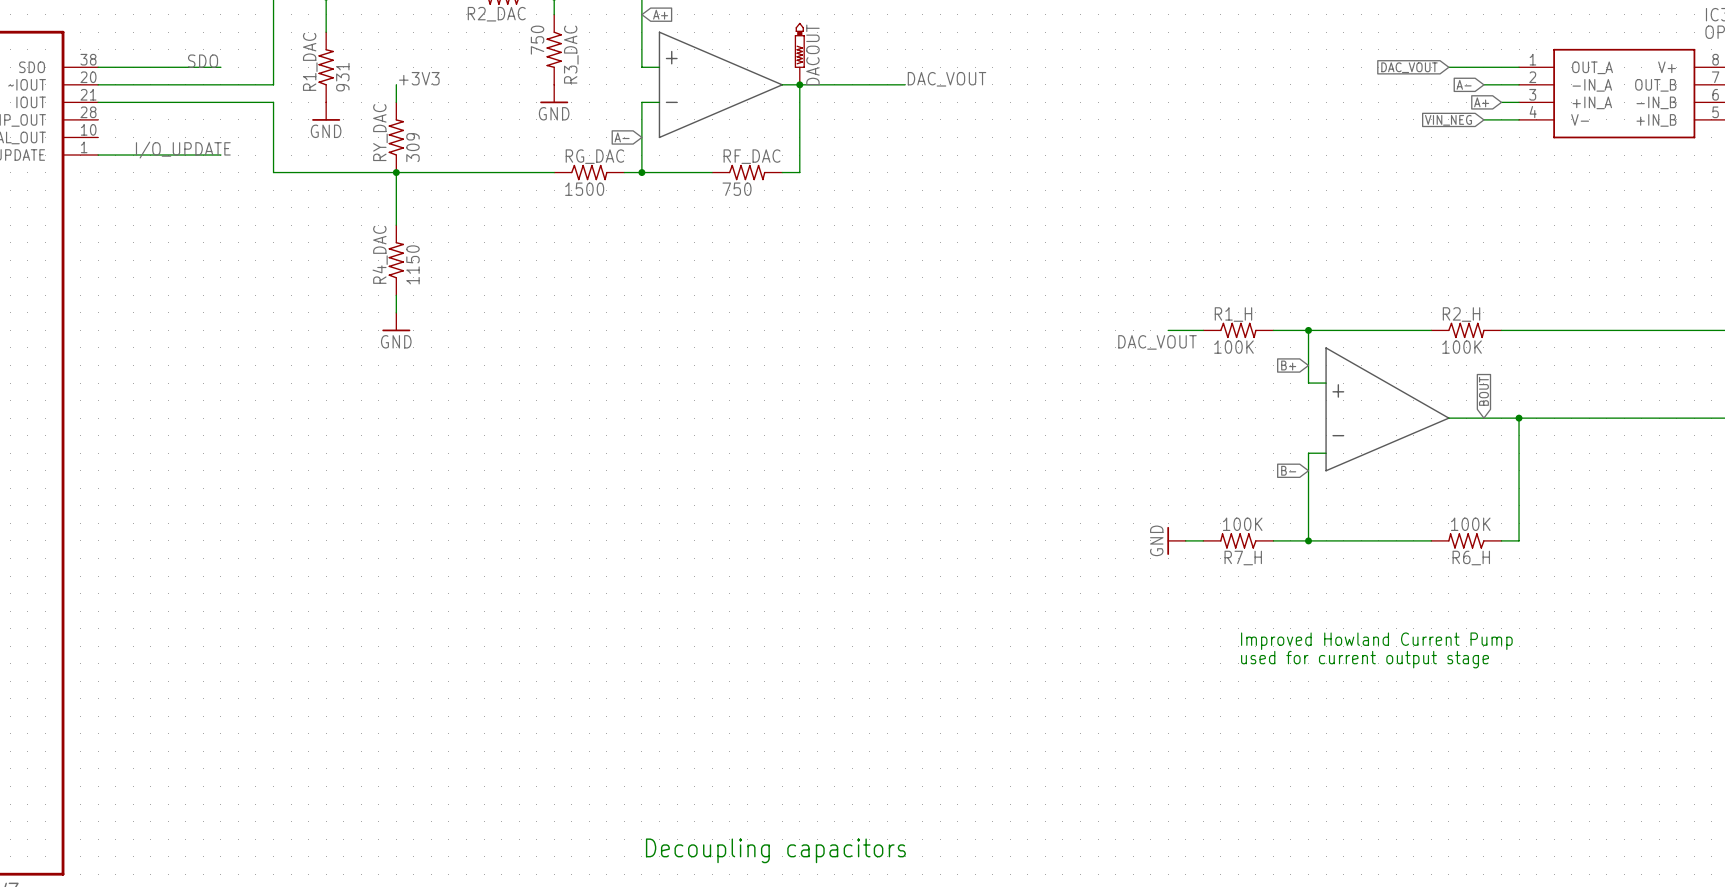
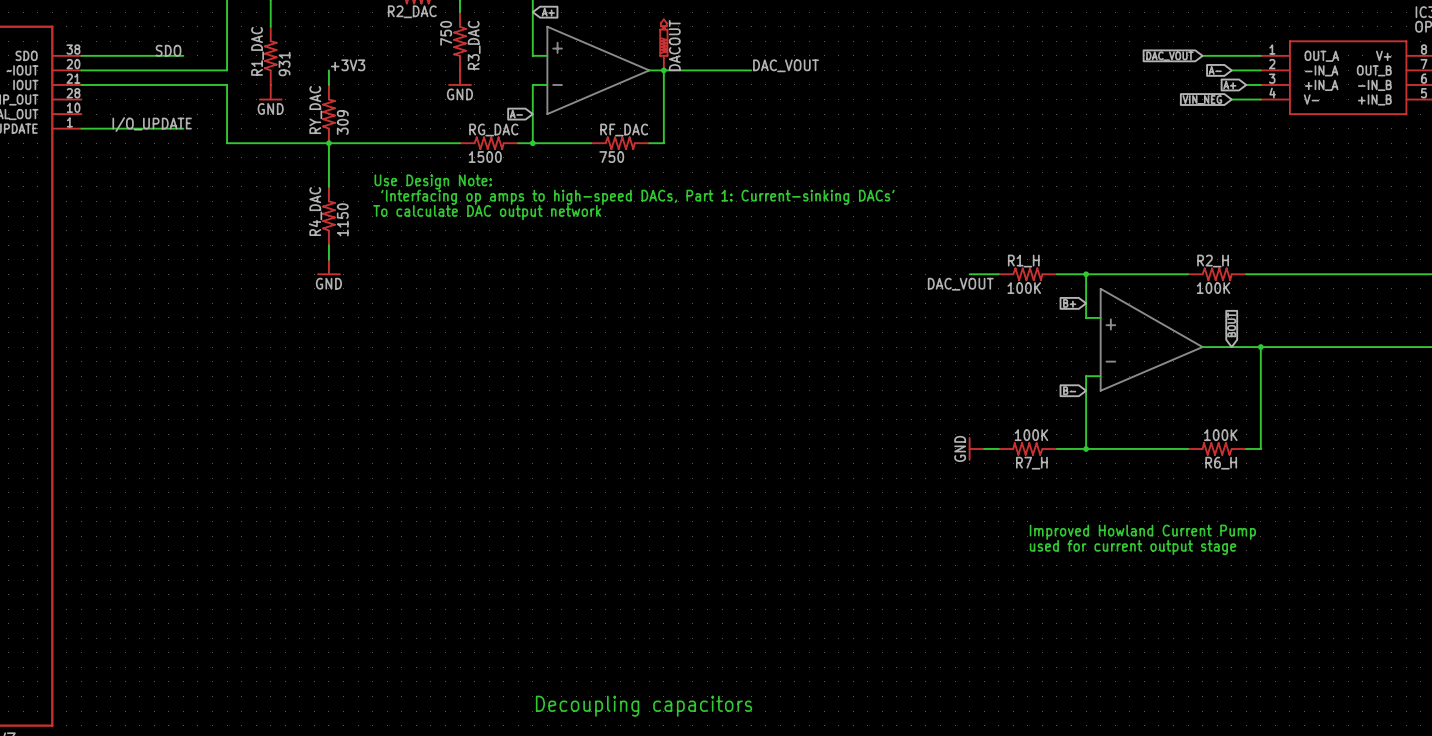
text: none -> Use Design Note: (433, 182)
text: none -> 'Interfacing op amps to high-speed DACs, Part 1: Current-sinking DACs' (637, 197)
text: none -> To calculate DAC output network (487, 212)

